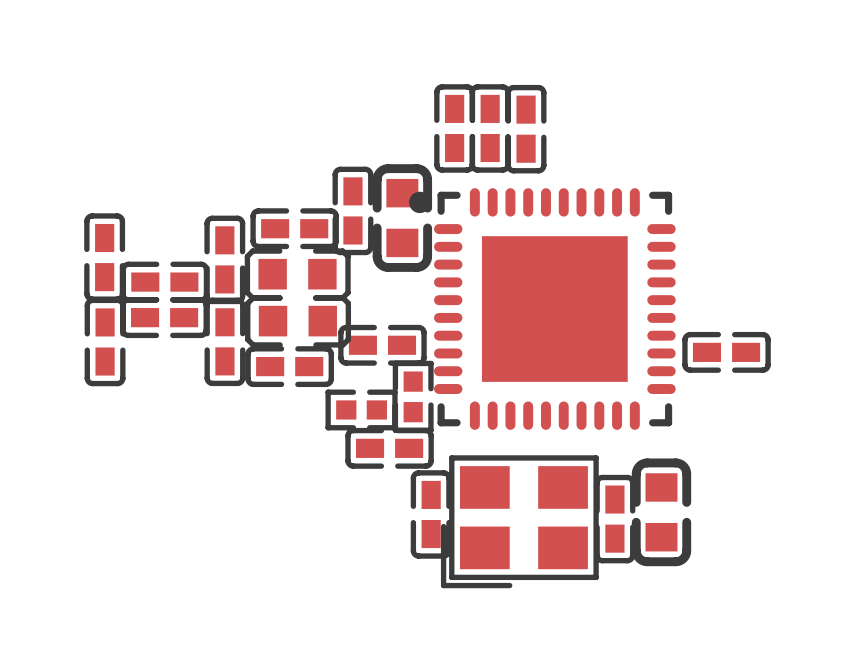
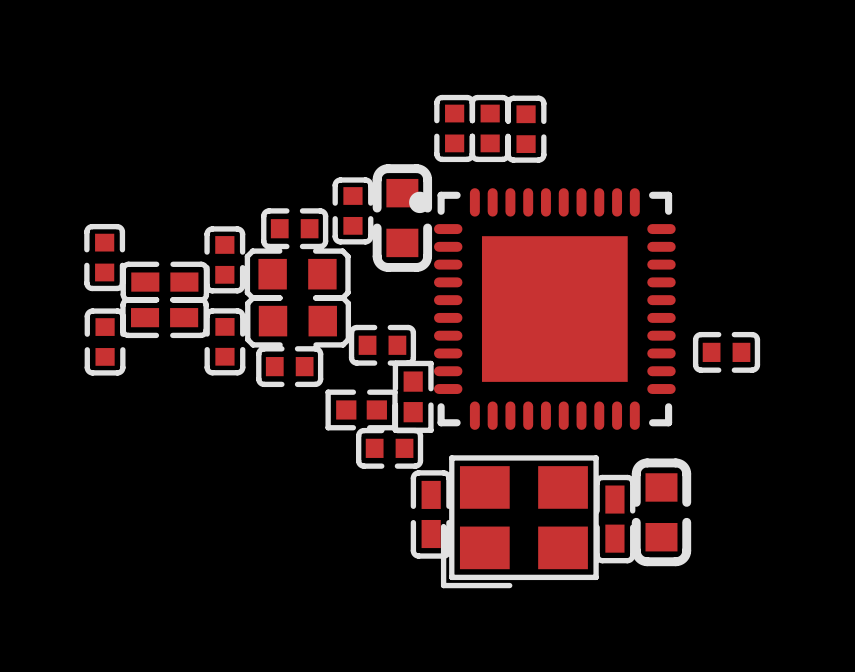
part footprint: [434, 84, 476, 173] -> [434, 94, 476, 163]
part footprint: [469, 84, 511, 173] -> [469, 94, 511, 163]
part footprint: [505, 84, 547, 174] -> [505, 95, 547, 163]
part footprint: [332, 166, 374, 256] -> [332, 177, 374, 245]
part footprint: [250, 208, 339, 250] -> [261, 208, 329, 250]
part footprint: [84, 213, 126, 302] -> [84, 223, 126, 292]
part footprint: [204, 215, 246, 305] -> [204, 226, 246, 294]
part footprint: [84, 297, 126, 387] -> [84, 308, 126, 376]
part footprint: [204, 297, 246, 387] -> [204, 308, 246, 376]
part footprint: [338, 324, 427, 366] -> [348, 324, 417, 366]
part footprint: [682, 331, 771, 373] -> [692, 331, 761, 373]
part footprint: [245, 346, 334, 388] -> [256, 346, 324, 388]
part footprint: [345, 427, 434, 469] -> [355, 427, 424, 469]

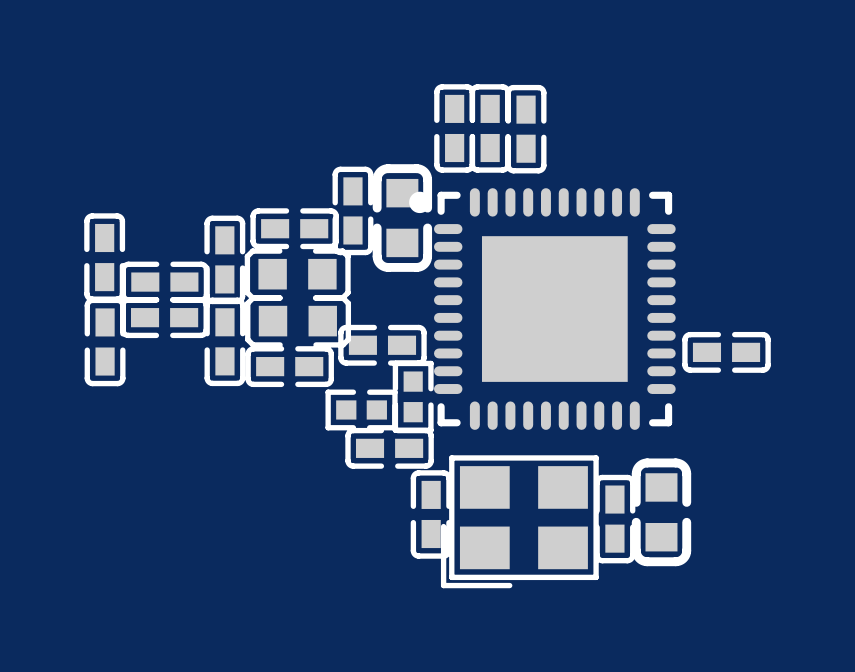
part footprint: [434, 94, 476, 163] -> [434, 84, 476, 173]
part footprint: [469, 94, 511, 163] -> [469, 84, 511, 173]
part footprint: [505, 95, 547, 163] -> [505, 84, 547, 174]
part footprint: [332, 177, 374, 245] -> [332, 166, 374, 256]
part footprint: [261, 208, 329, 250] -> [250, 208, 339, 250]
part footprint: [84, 223, 126, 292] -> [84, 213, 126, 302]
part footprint: [204, 226, 246, 294] -> [204, 215, 246, 305]
part footprint: [84, 308, 126, 376] -> [84, 297, 126, 387]
part footprint: [204, 308, 246, 376] -> [204, 297, 246, 387]
part footprint: [348, 324, 417, 366] -> [338, 324, 427, 366]
part footprint: [692, 331, 761, 373] -> [682, 331, 771, 373]
part footprint: [256, 346, 324, 388] -> [245, 346, 334, 388]
part footprint: [355, 427, 424, 469] -> [345, 427, 434, 469]

